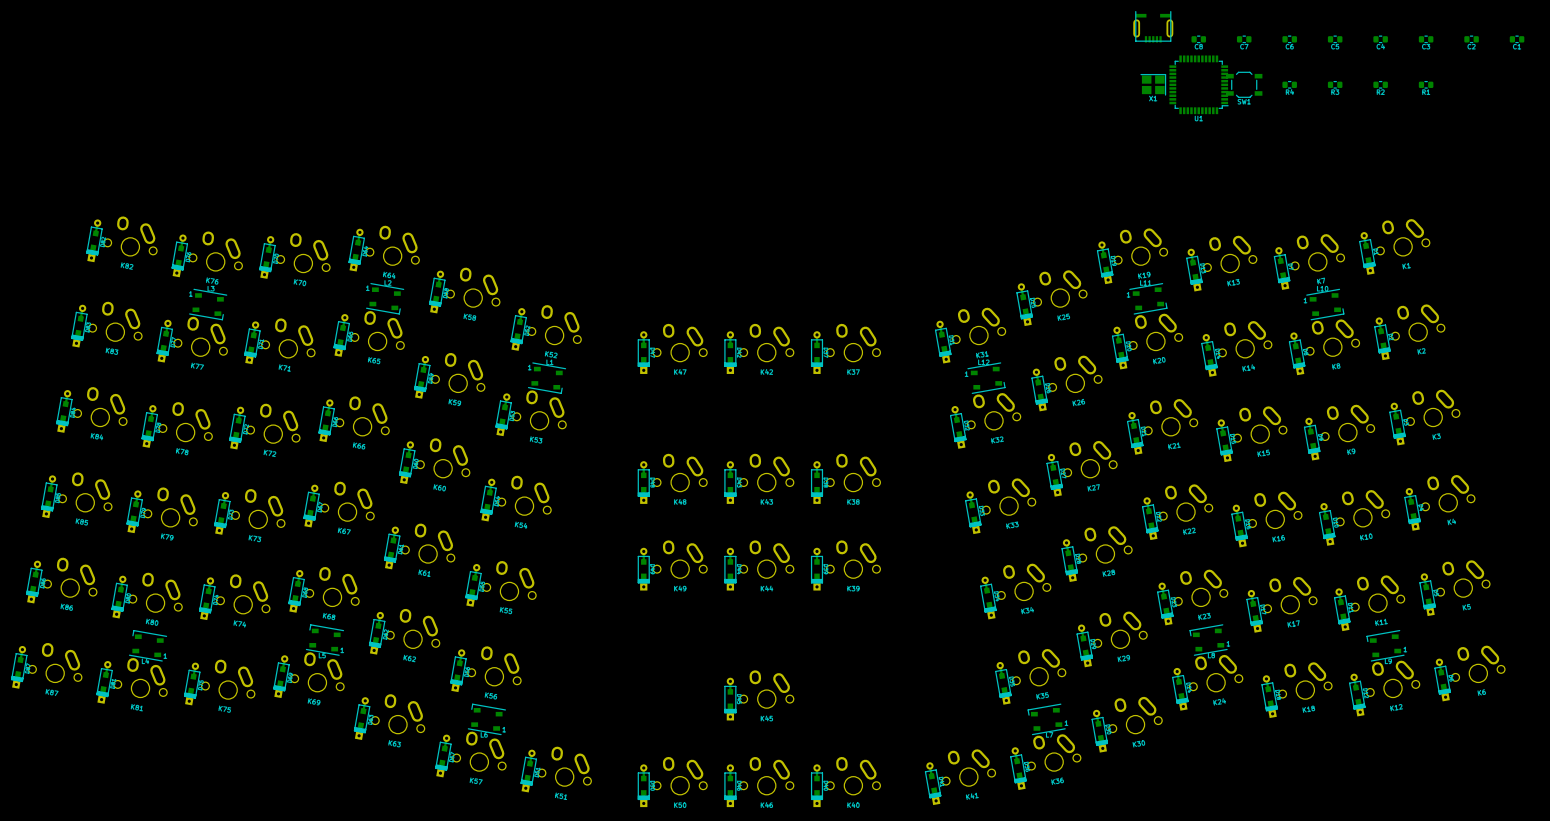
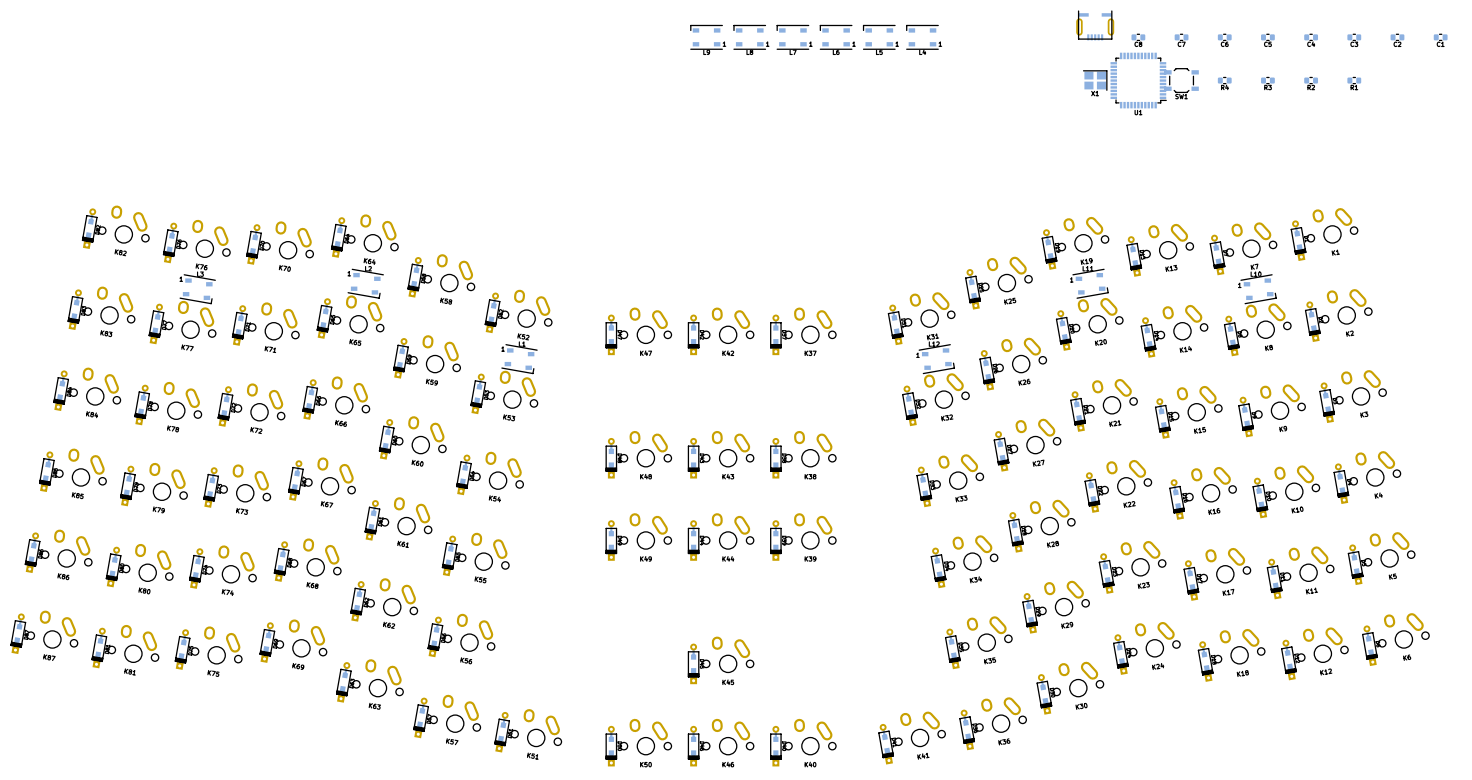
part footprint: [306, 624, 344, 656] -> [863, 25, 896, 50]
part footprint: [1189, 624, 1228, 656] -> [733, 25, 766, 50]
part footprint: [129, 630, 167, 662] -> [906, 25, 939, 50]
part footprint: [1366, 630, 1405, 662] -> [690, 25, 723, 50]
part footprint: [468, 703, 506, 735] -> [820, 25, 853, 50]
part footprint: [1027, 703, 1066, 735] -> [776, 25, 809, 50]

